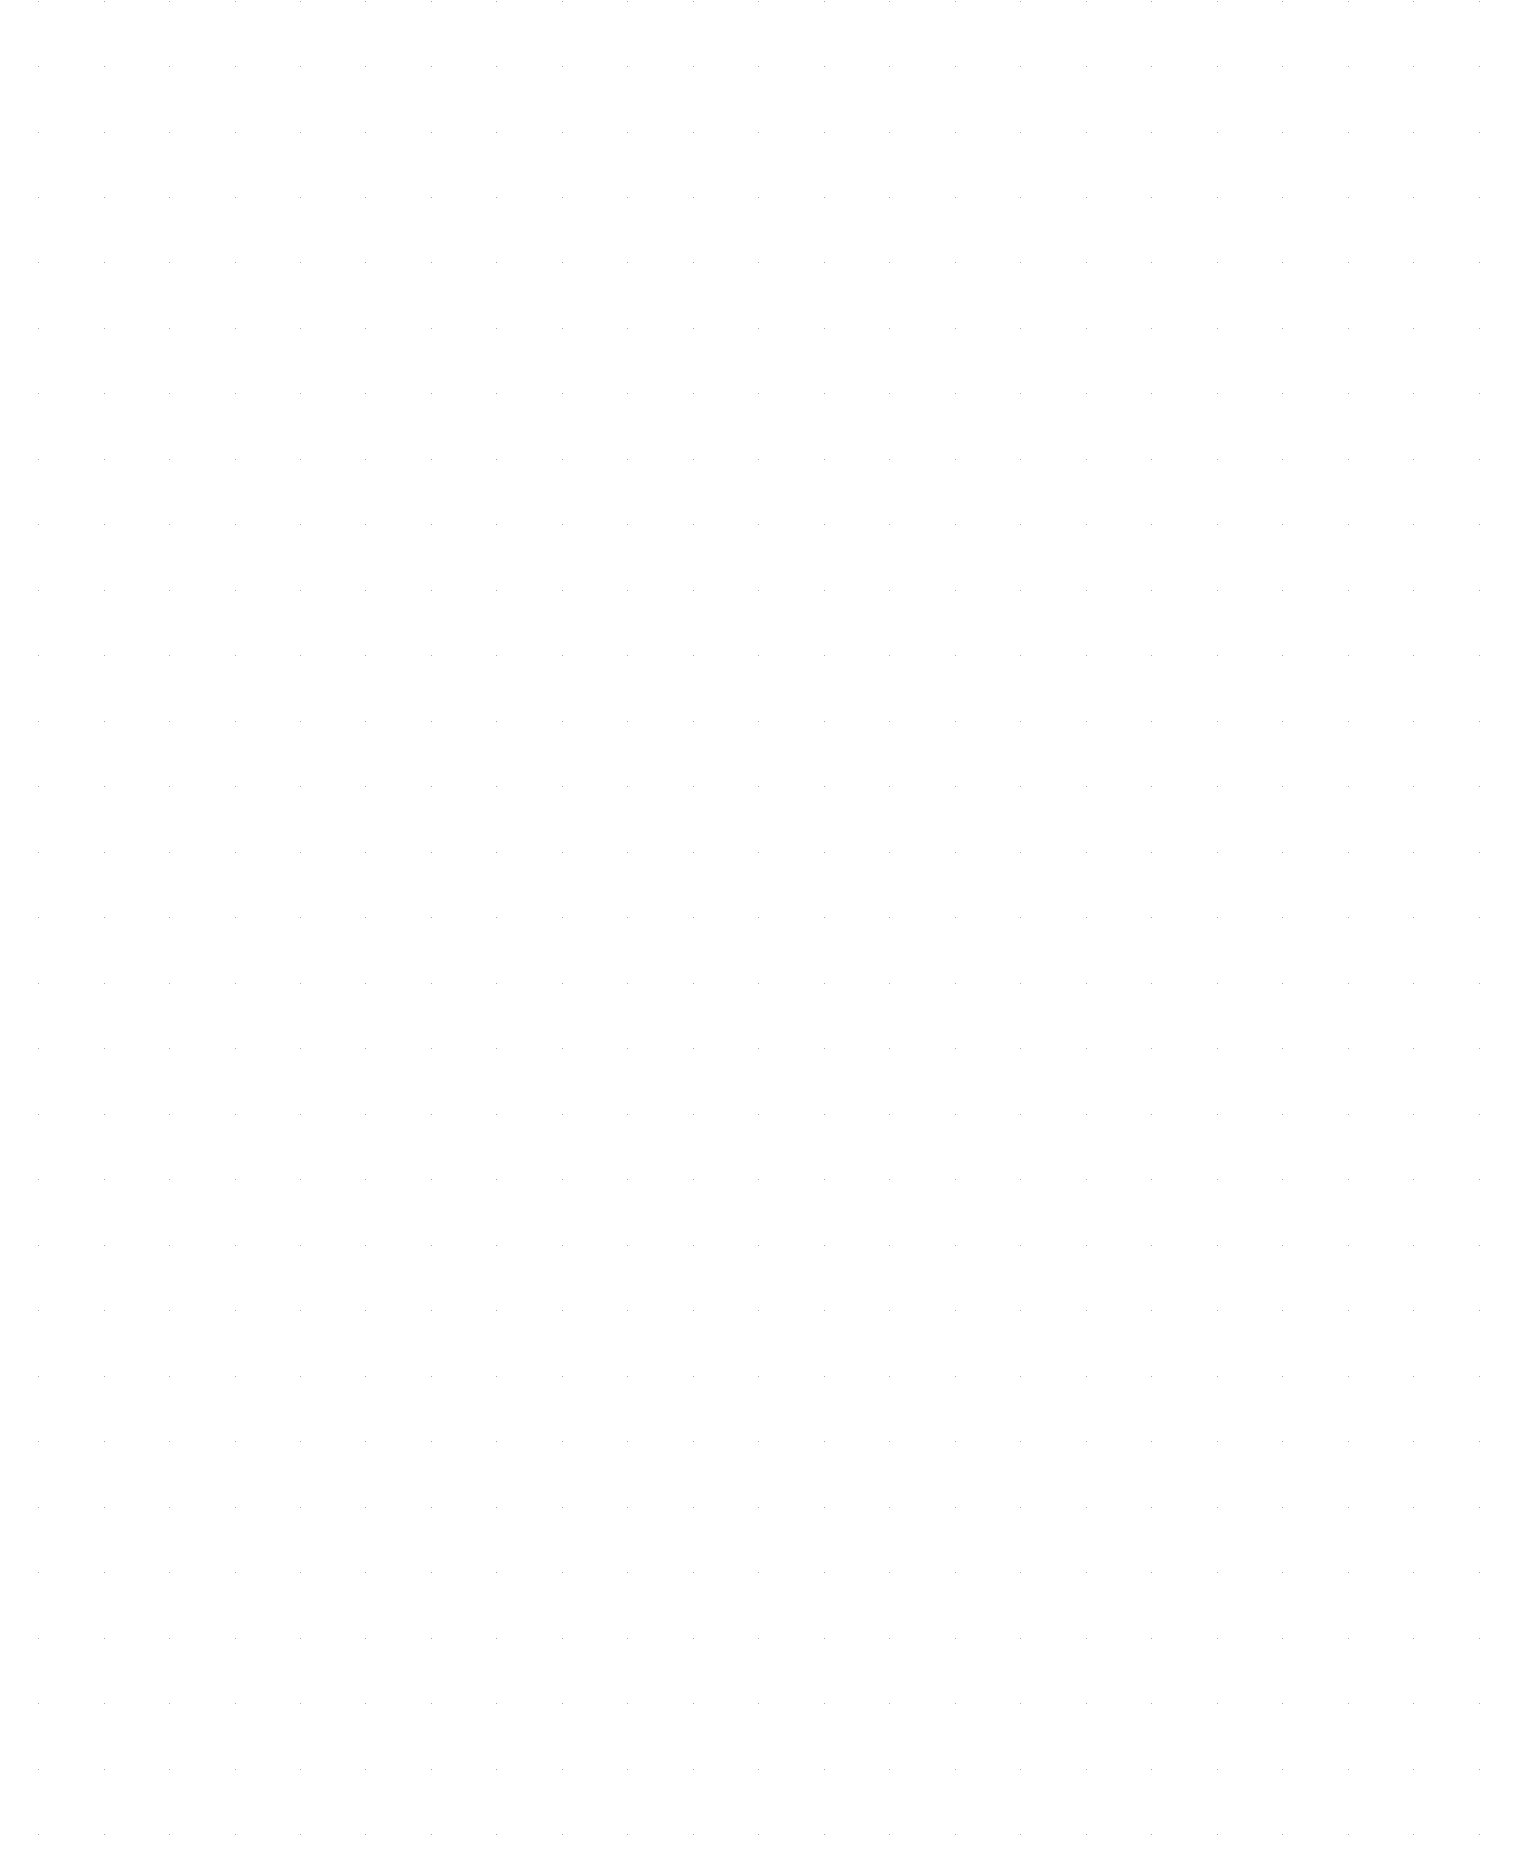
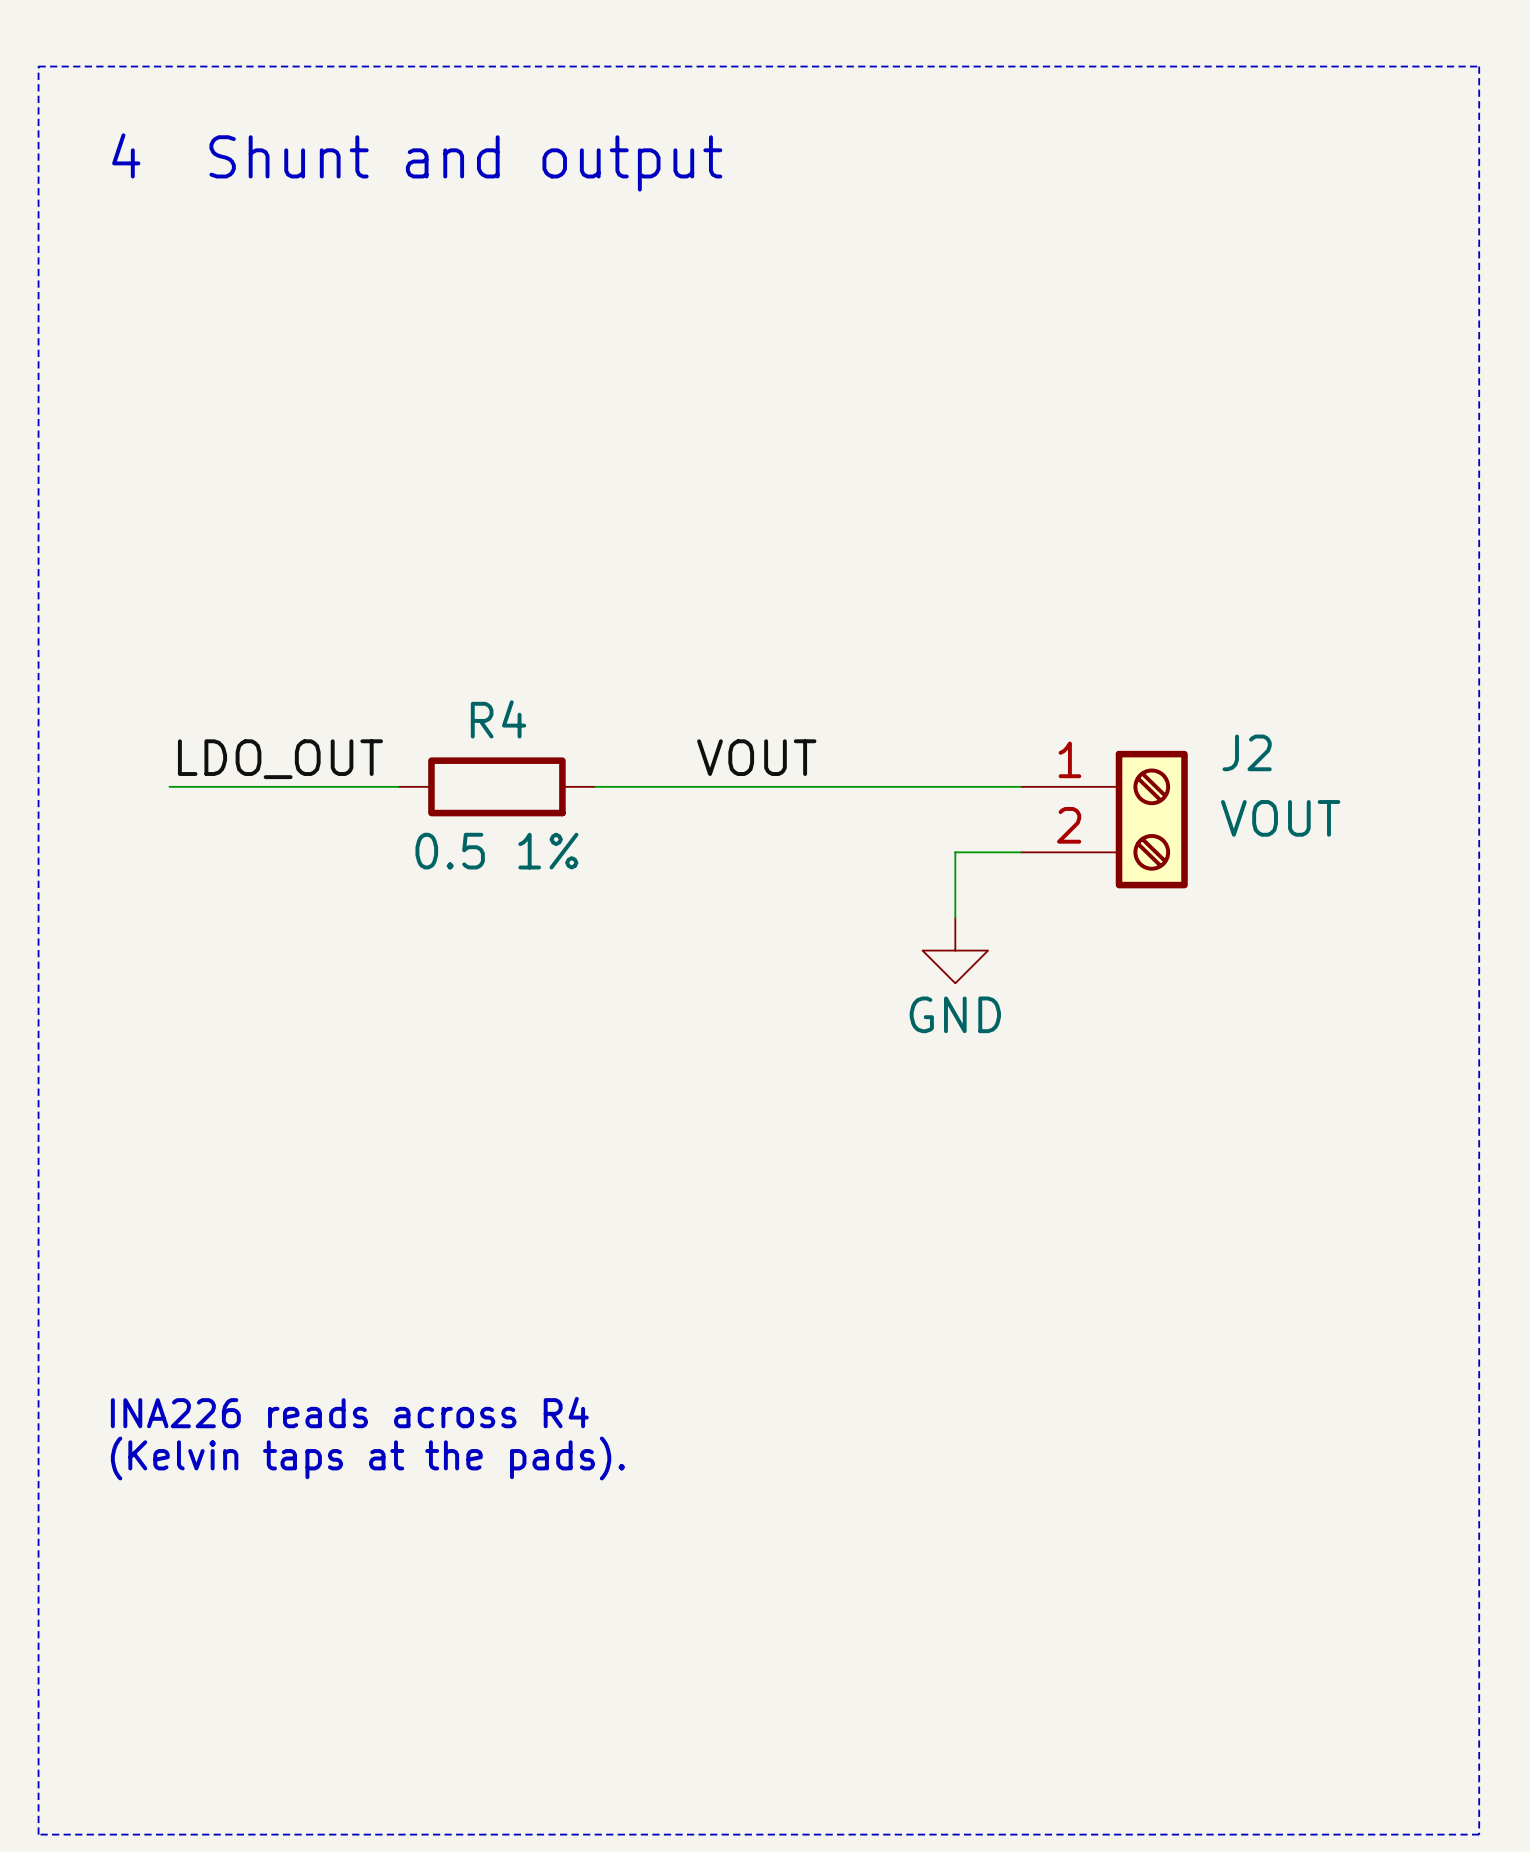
line: none -> (38, 66) (1479, 66) (1479, 1834) (38, 1834) (38, 66)
text: none -> 4 Shunt and output (417, 162)
label: none -> VOUT (756, 757)
label: none -> LDO_OUT (280, 759)
wire: none -> (169, 786) (398, 786)
R4: none -> 0.5 1% (496, 786)
wire: none -> (595, 786) (1020, 786)
J2: none -> VOUT (1104, 819)
wire: none -> (1020, 852) (955, 852) (955, 917)
power symbol: none -> GND (955, 950)
text: none -> INA226 reads across R4 (349, 1412)
text: none -> (Kelvin taps at the pads). (367, 1458)

